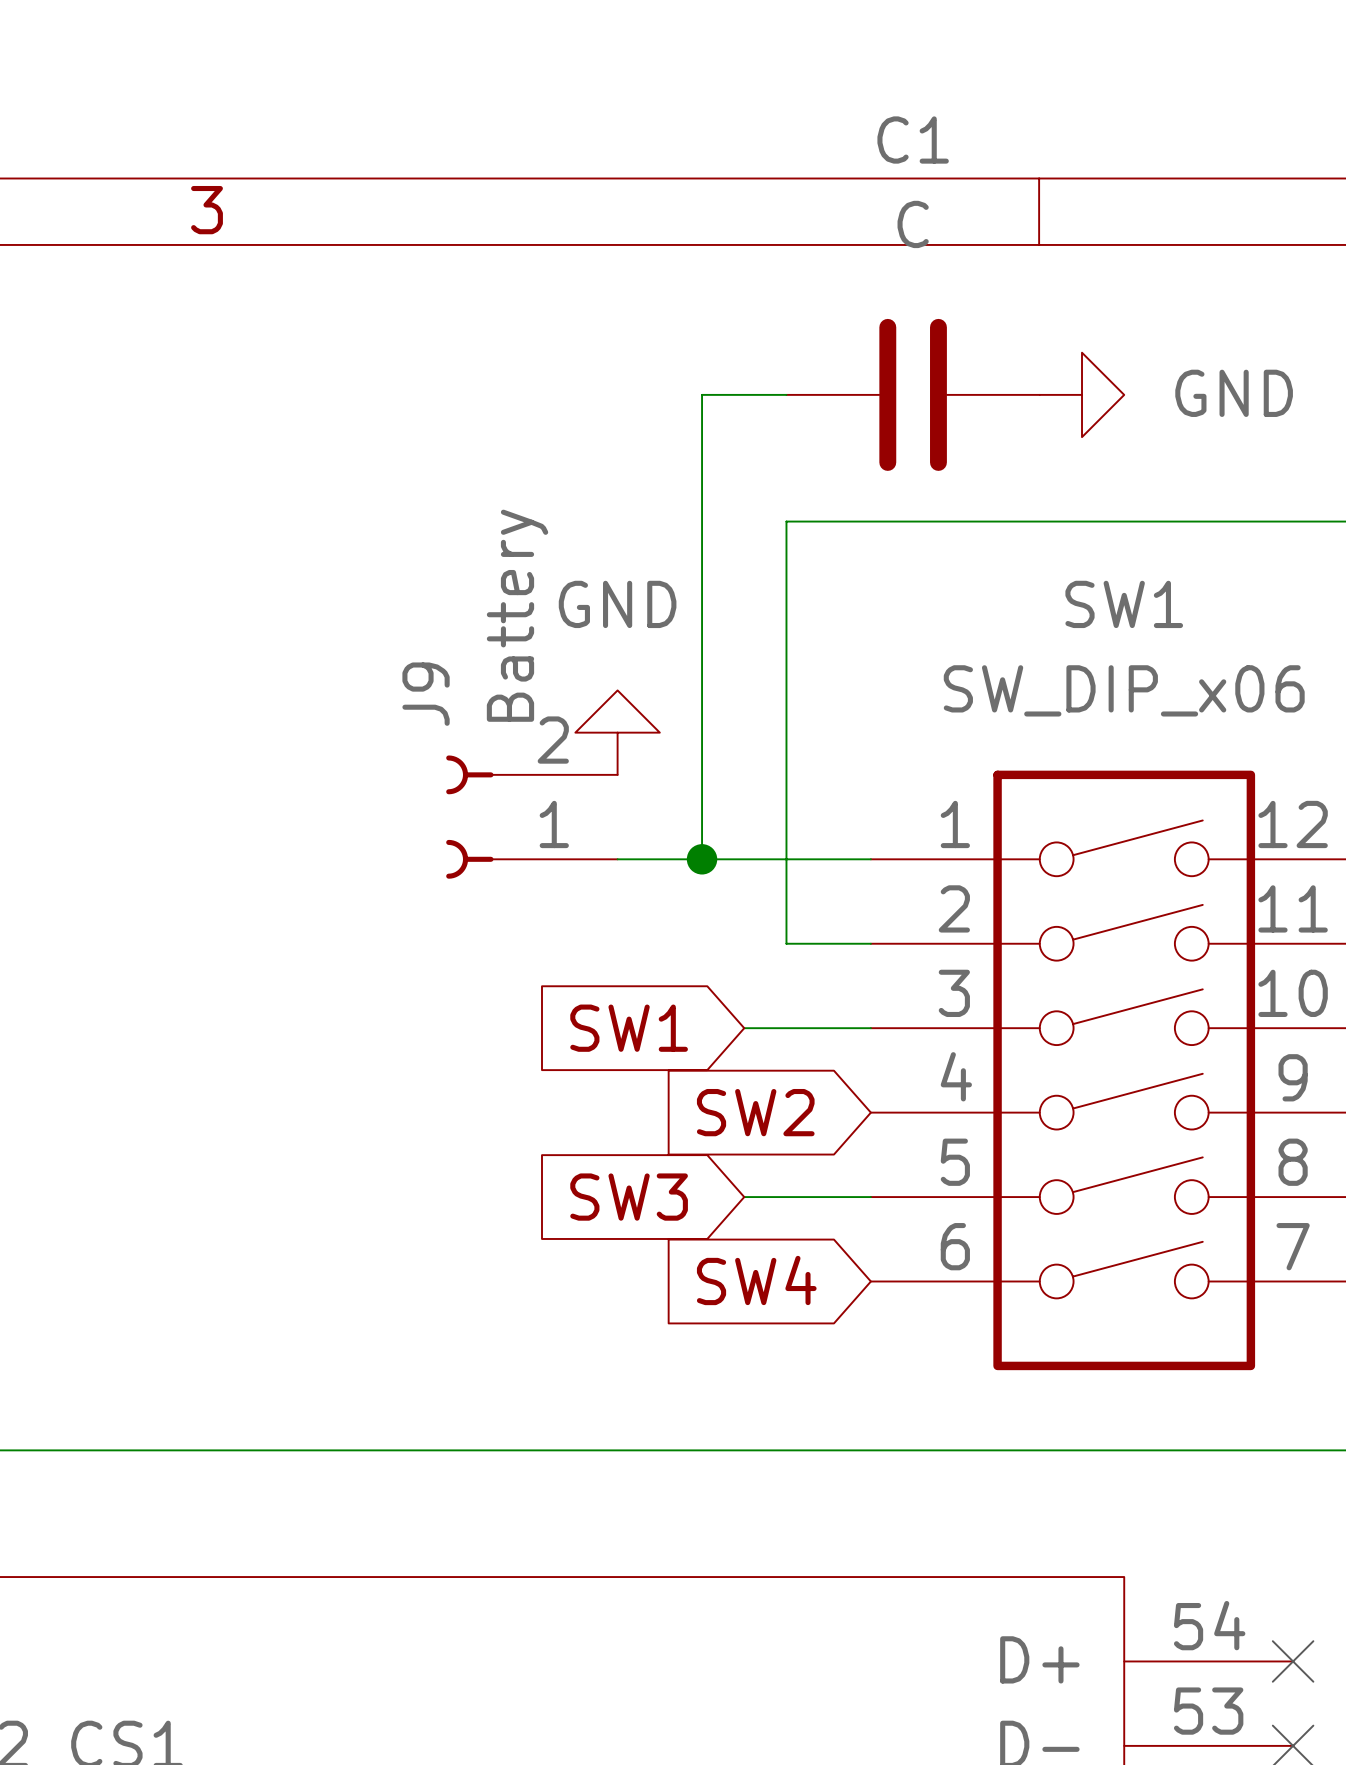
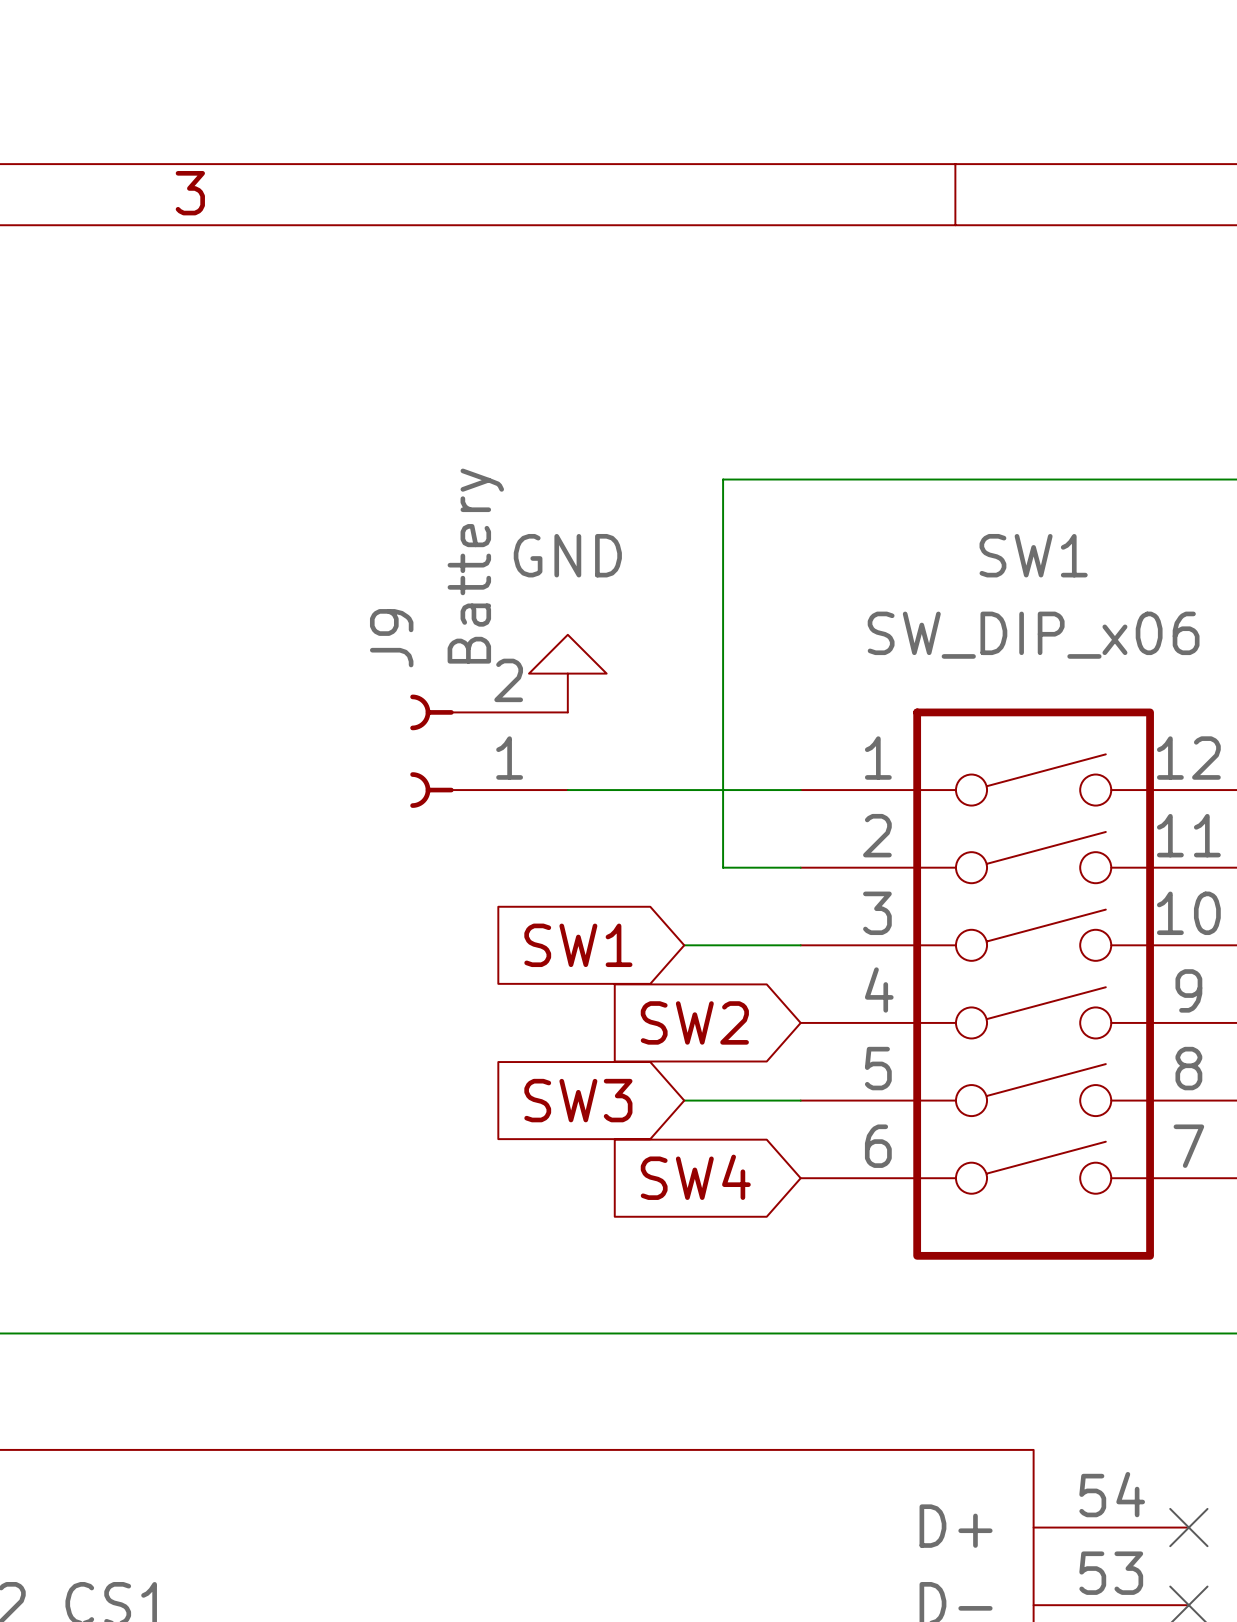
wire: (786, 394) (702, 394) (702, 859) -> none
C1: C (913, 394) -> none
power symbol: GND (1082, 394) -> none
junction: (702, 859) -> none

